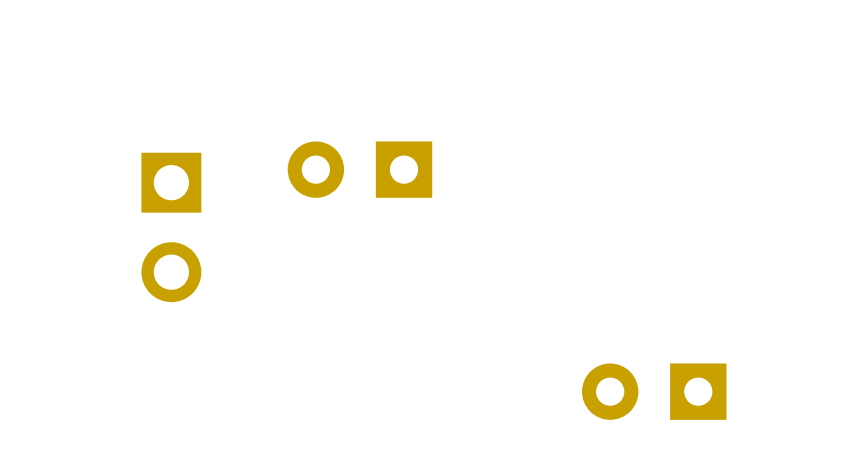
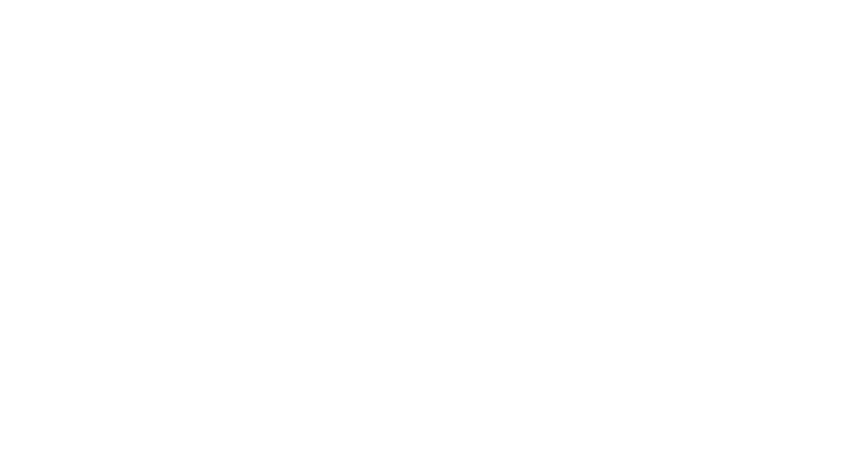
part: (359, 169) -> none
part: (171, 227) -> none
part: (654, 391) -> none

